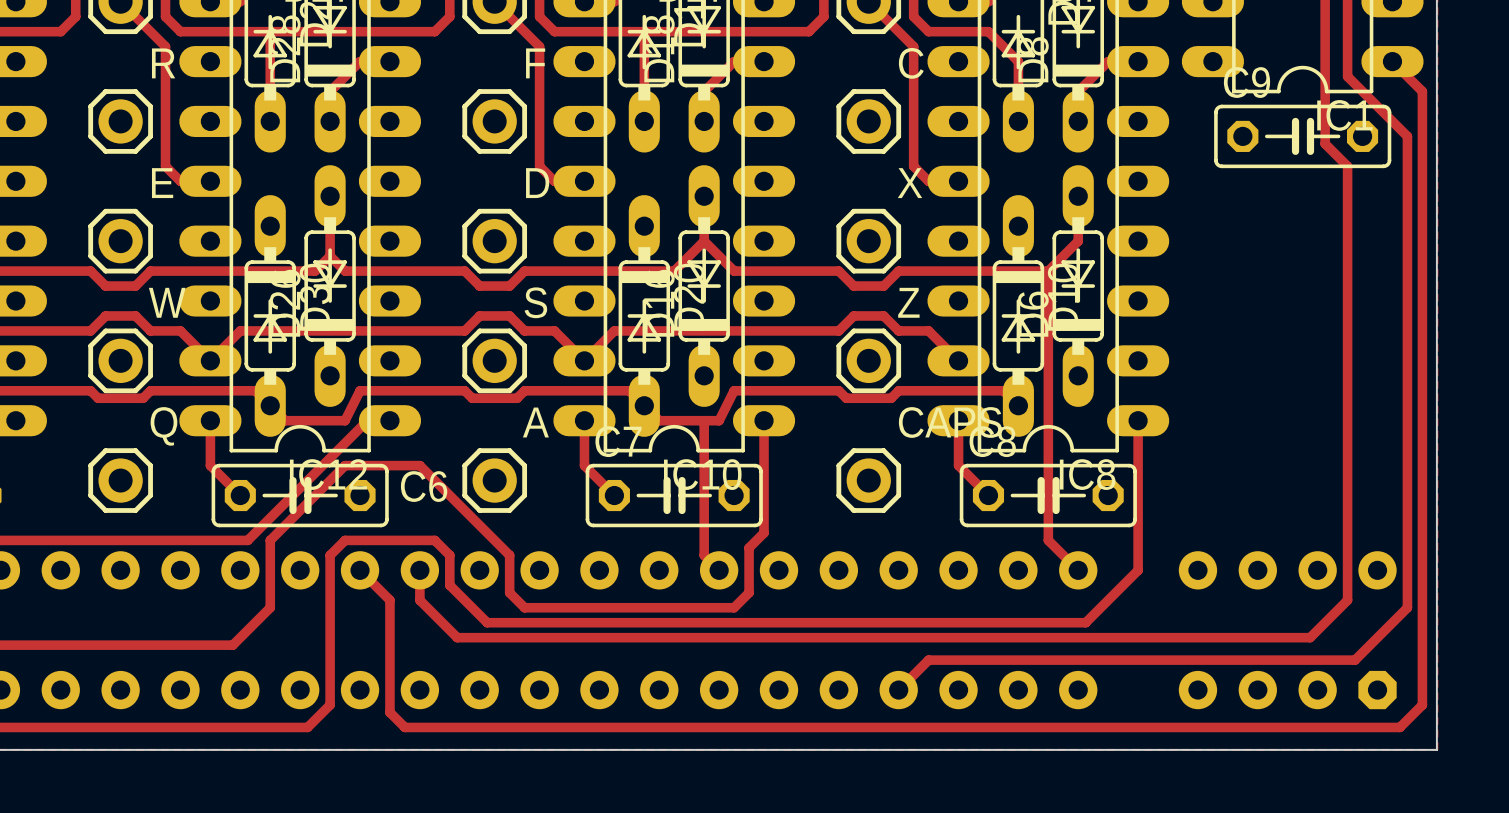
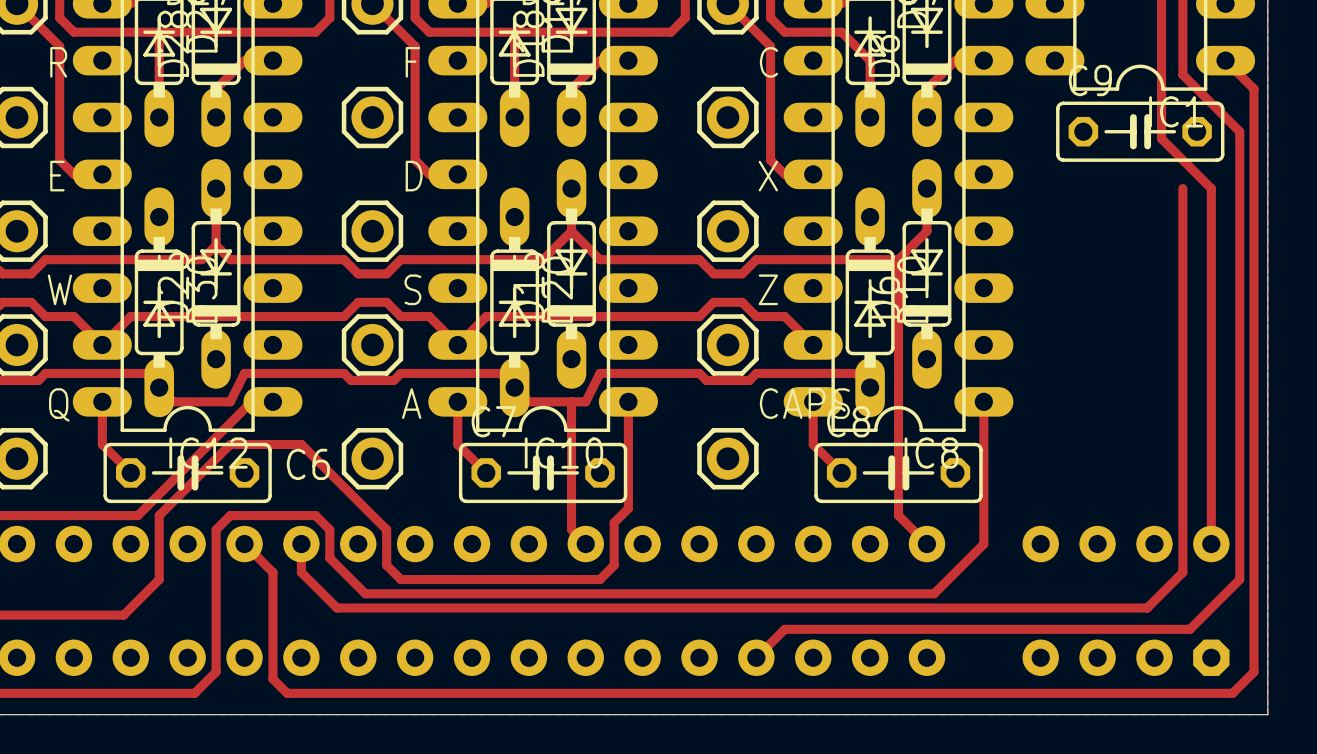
track: (1347, 166) (1347, 196) -> (1182, 160) (1211, 188) (1211, 544)

